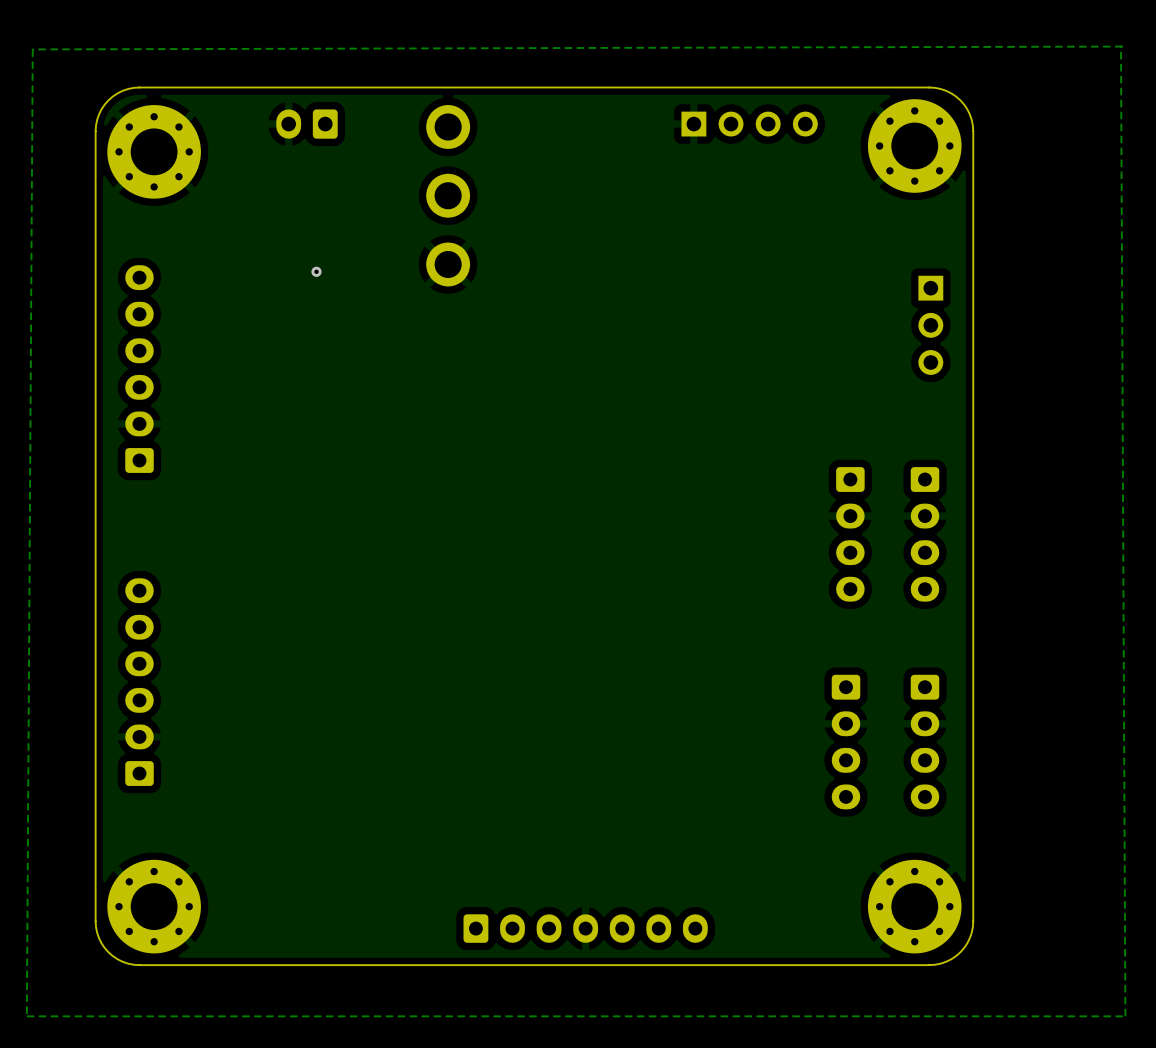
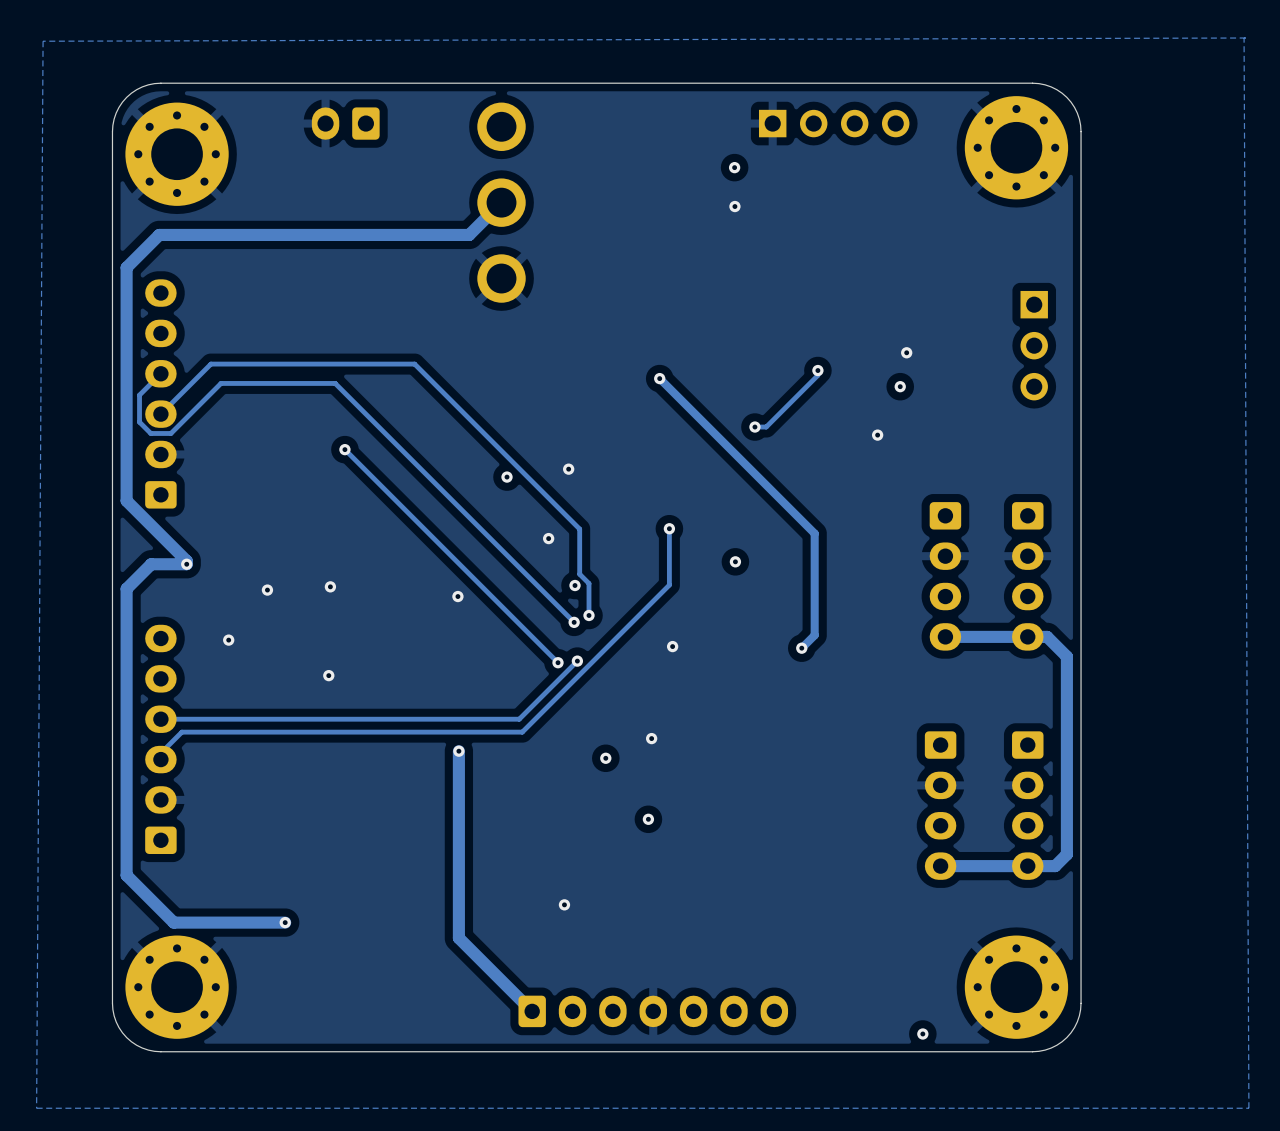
via: none -> (734, 167)
track: none -> (501, 202) (469, 234) (159, 234) (126, 267) (126, 500) (186, 561) (186, 564) (151, 564) (126, 588) (126, 875) (173, 922) (285, 922)
via: none -> (734, 206)
via: (316, 271) -> none
via: none -> (906, 352)
track: none -> (817, 370) (817, 375) (766, 427) (754, 427)
via: none -> (817, 370)
track: none -> (160, 373) (139, 395) (139, 422) (150, 433) (170, 433) (220, 383) (335, 383) (574, 622)
track: none -> (659, 378) (814, 533) (814, 635) (801, 648)
via: none -> (659, 378)
via: none -> (900, 386)
track: none -> (160, 414) (210, 364) (414, 364) (579, 529) (579, 574) (588, 583) (588, 615)
via: none -> (754, 427)
via: none -> (877, 435)
track: none -> (344, 449) (558, 662)
via: none -> (344, 449)
via: none -> (568, 469)
via: none -> (507, 477)
track: none -> (669, 528) (669, 585) (522, 732) (181, 732) (160, 753) (160, 759)
via: none -> (669, 528)
via: none -> (548, 538)
via: none -> (735, 561)
via: none -> (186, 564)
via: none -> (575, 585)
via: none -> (330, 586)
via: none -> (267, 590)
via: none -> (457, 596)
via: none -> (588, 615)
via: none -> (574, 622)
track: none -> (945, 636) (1047, 636) (1066, 656) (1066, 854) (1055, 866) (940, 866)
via: none -> (228, 640)
via: none -> (672, 646)
via: none -> (801, 648)
track: none -> (577, 661) (519, 719) (160, 719)
via: none -> (577, 661)
via: none -> (558, 662)
via: none -> (328, 675)
via: none -> (651, 738)
track: none -> (458, 751) (458, 938) (532, 1011)
via: none -> (458, 751)
via: none -> (605, 758)
via: none -> (648, 819)
via: none -> (564, 904)
via: none -> (285, 922)
via: none -> (922, 1033)

